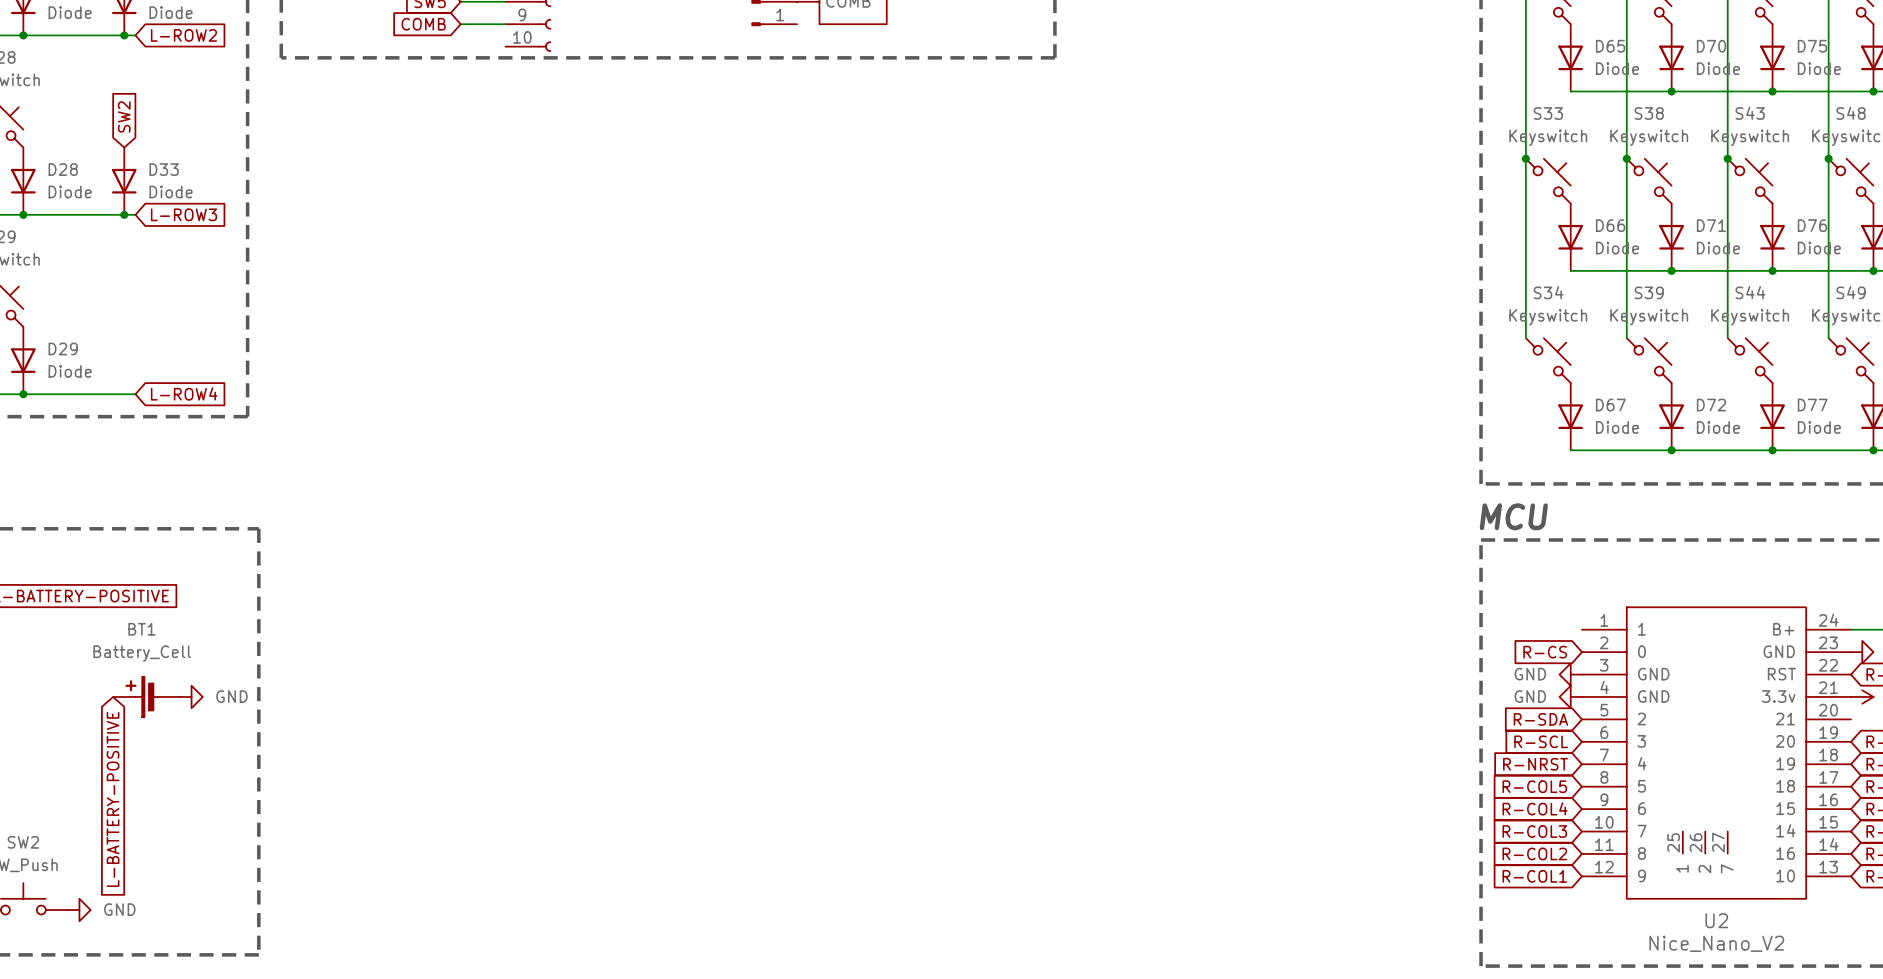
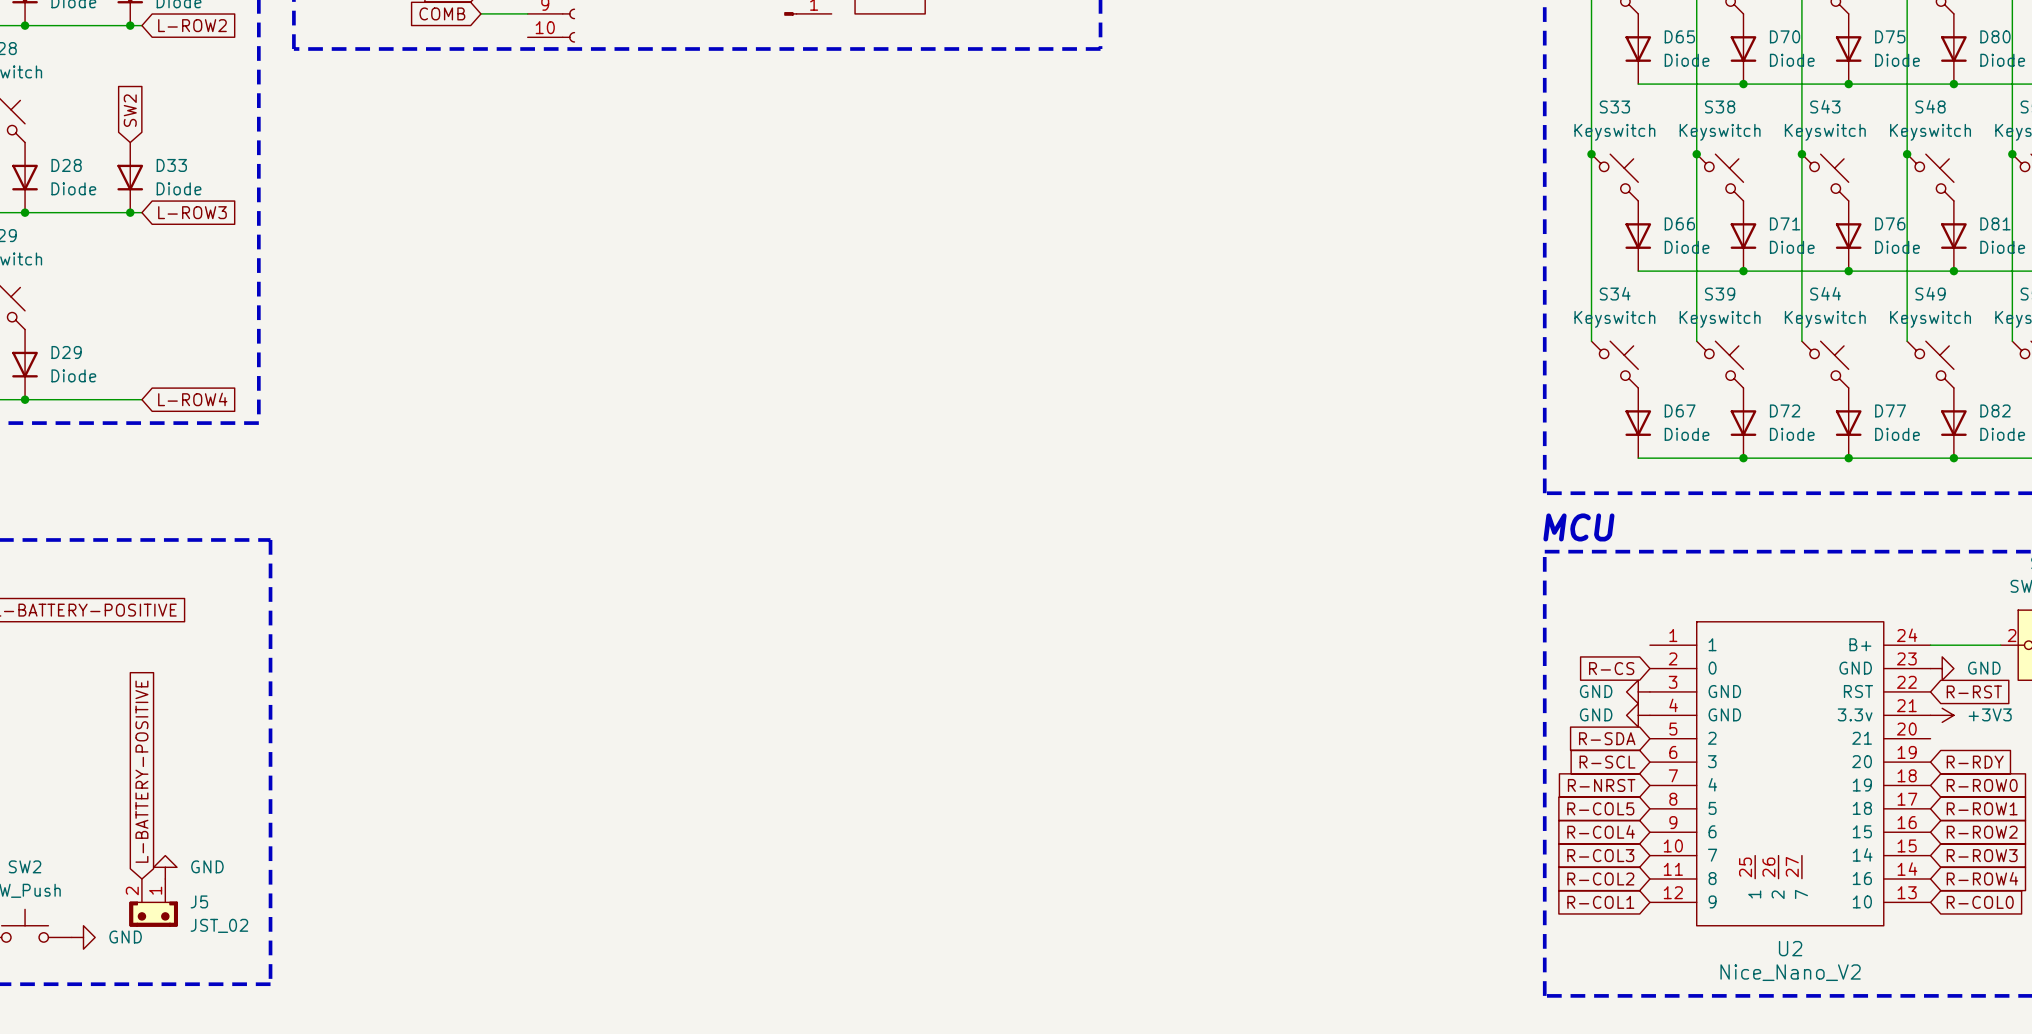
BT1: Battery_Cell (146, 696) -> none
power symbol rotation: 0° (191, 696) -> 90° counterclockwise (165, 867)
power symbol position: GND (191, 696) -> GND (165, 867)
global label rotation: 0° (113, 799) -> 180° (141, 771)
J5: none -> JST_02 (153, 902)

